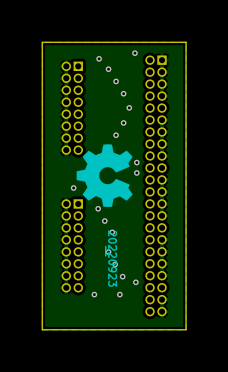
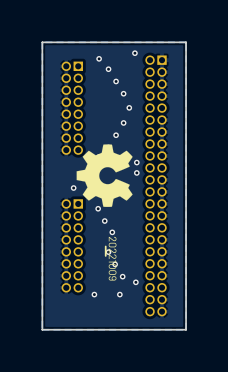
drawing shape: [105, 230, 118, 287] -> [105, 236, 117, 281]

